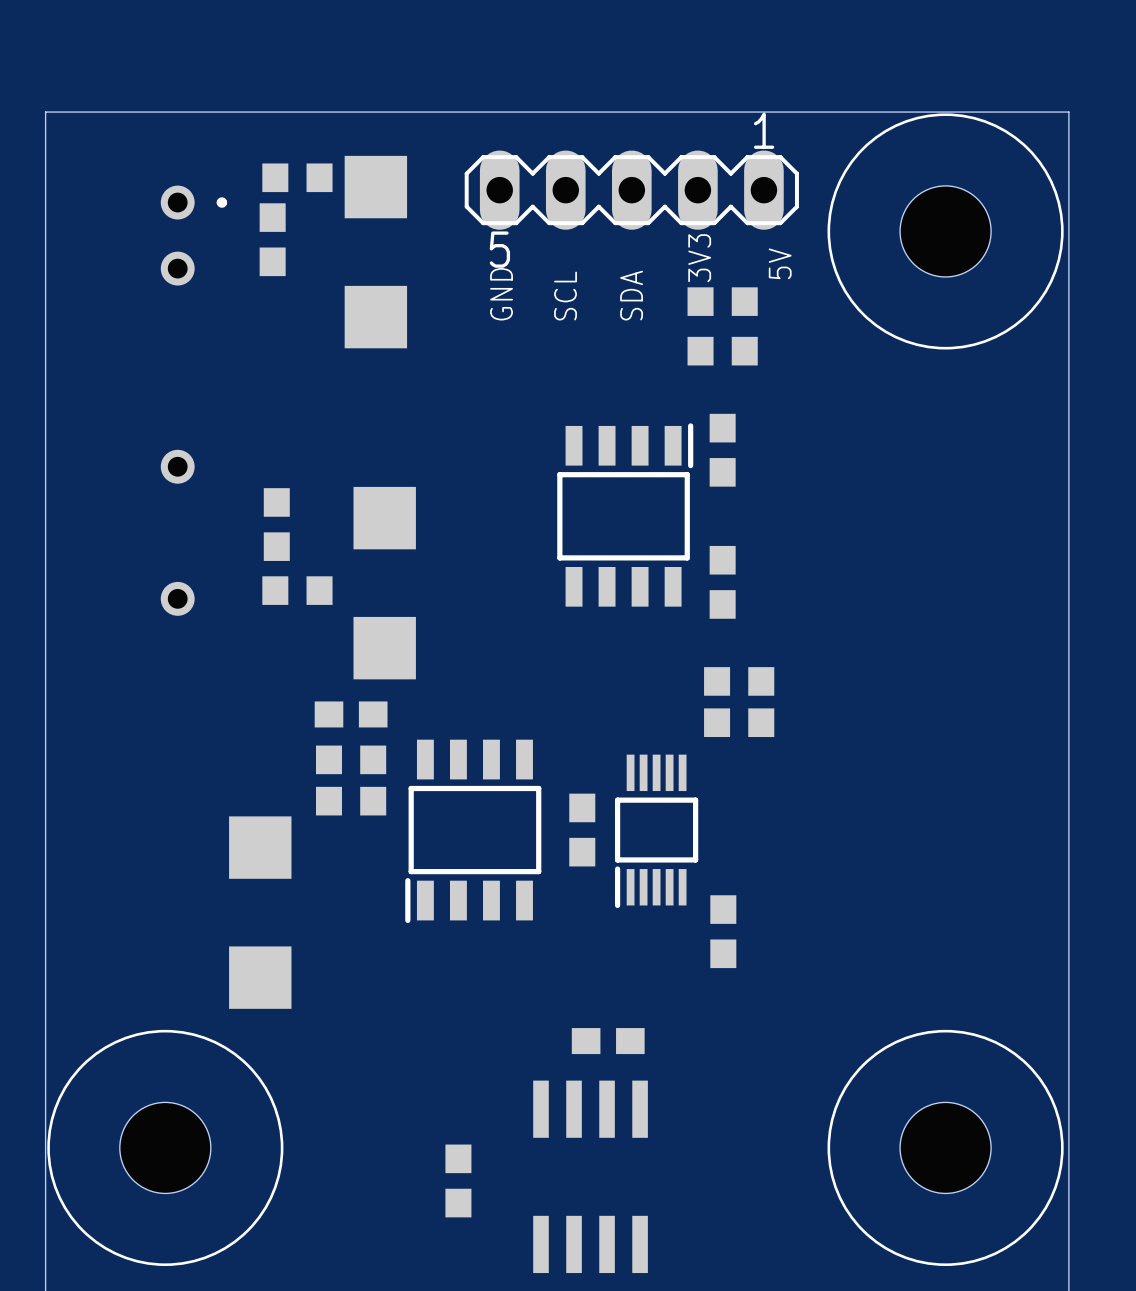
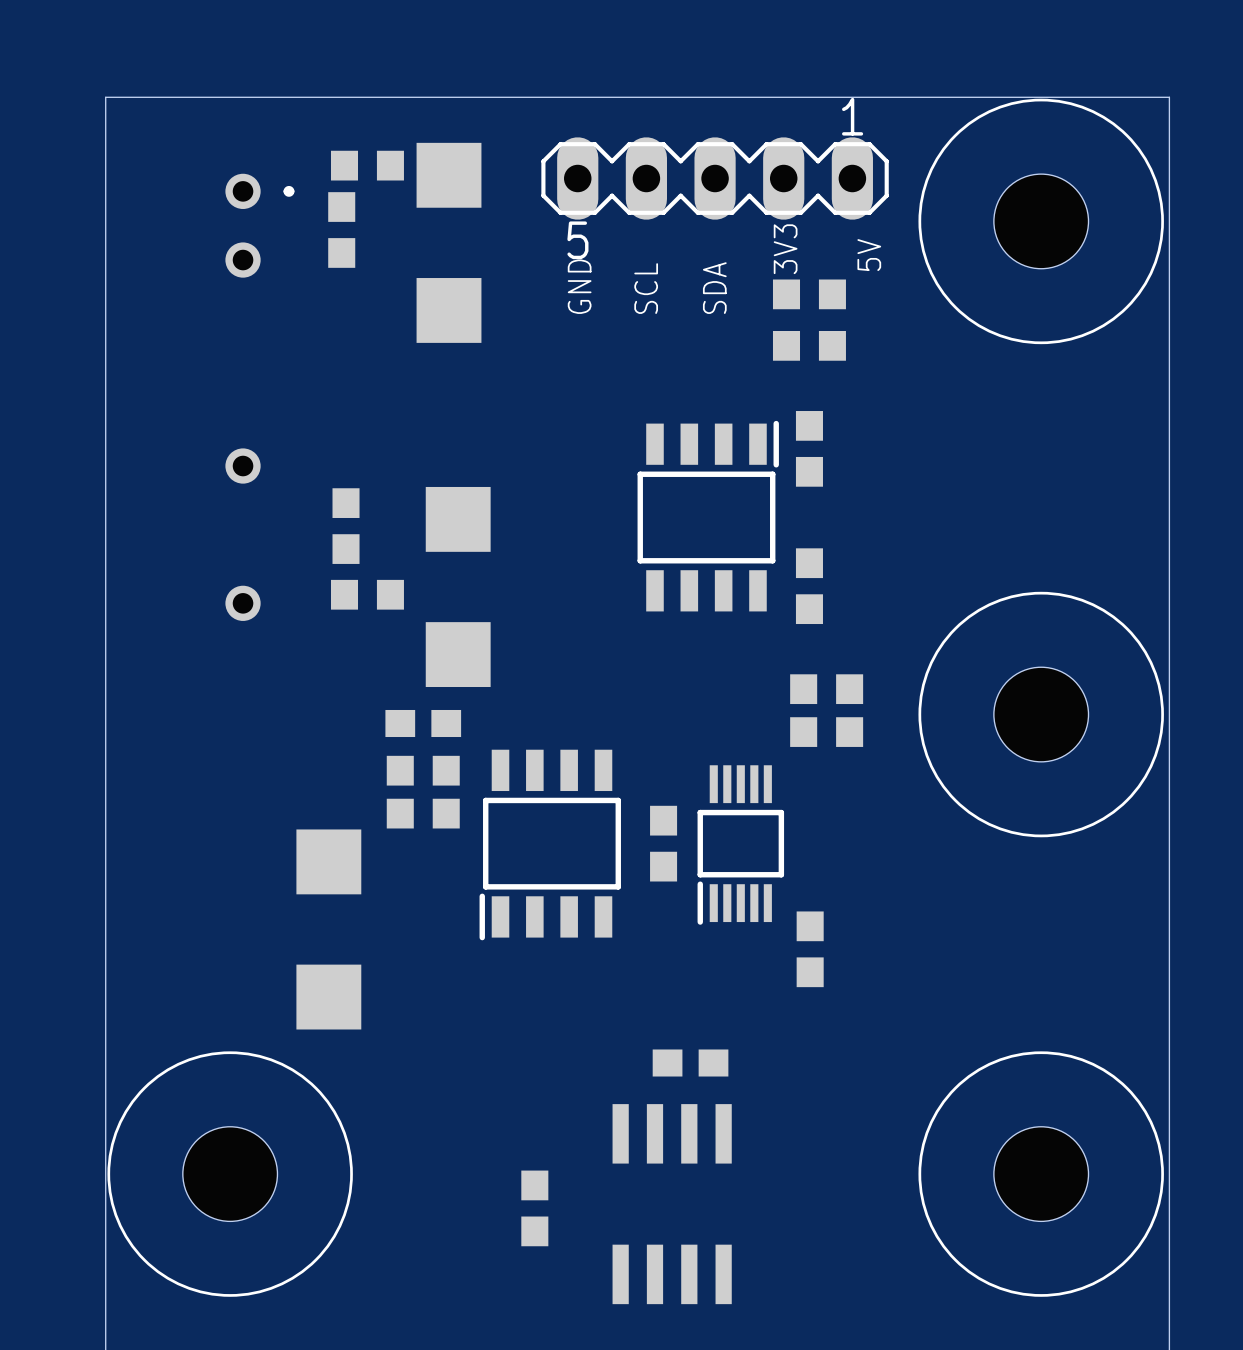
drawing: none -> [918, 591, 1164, 838]
hole: none -> (1041, 714)

